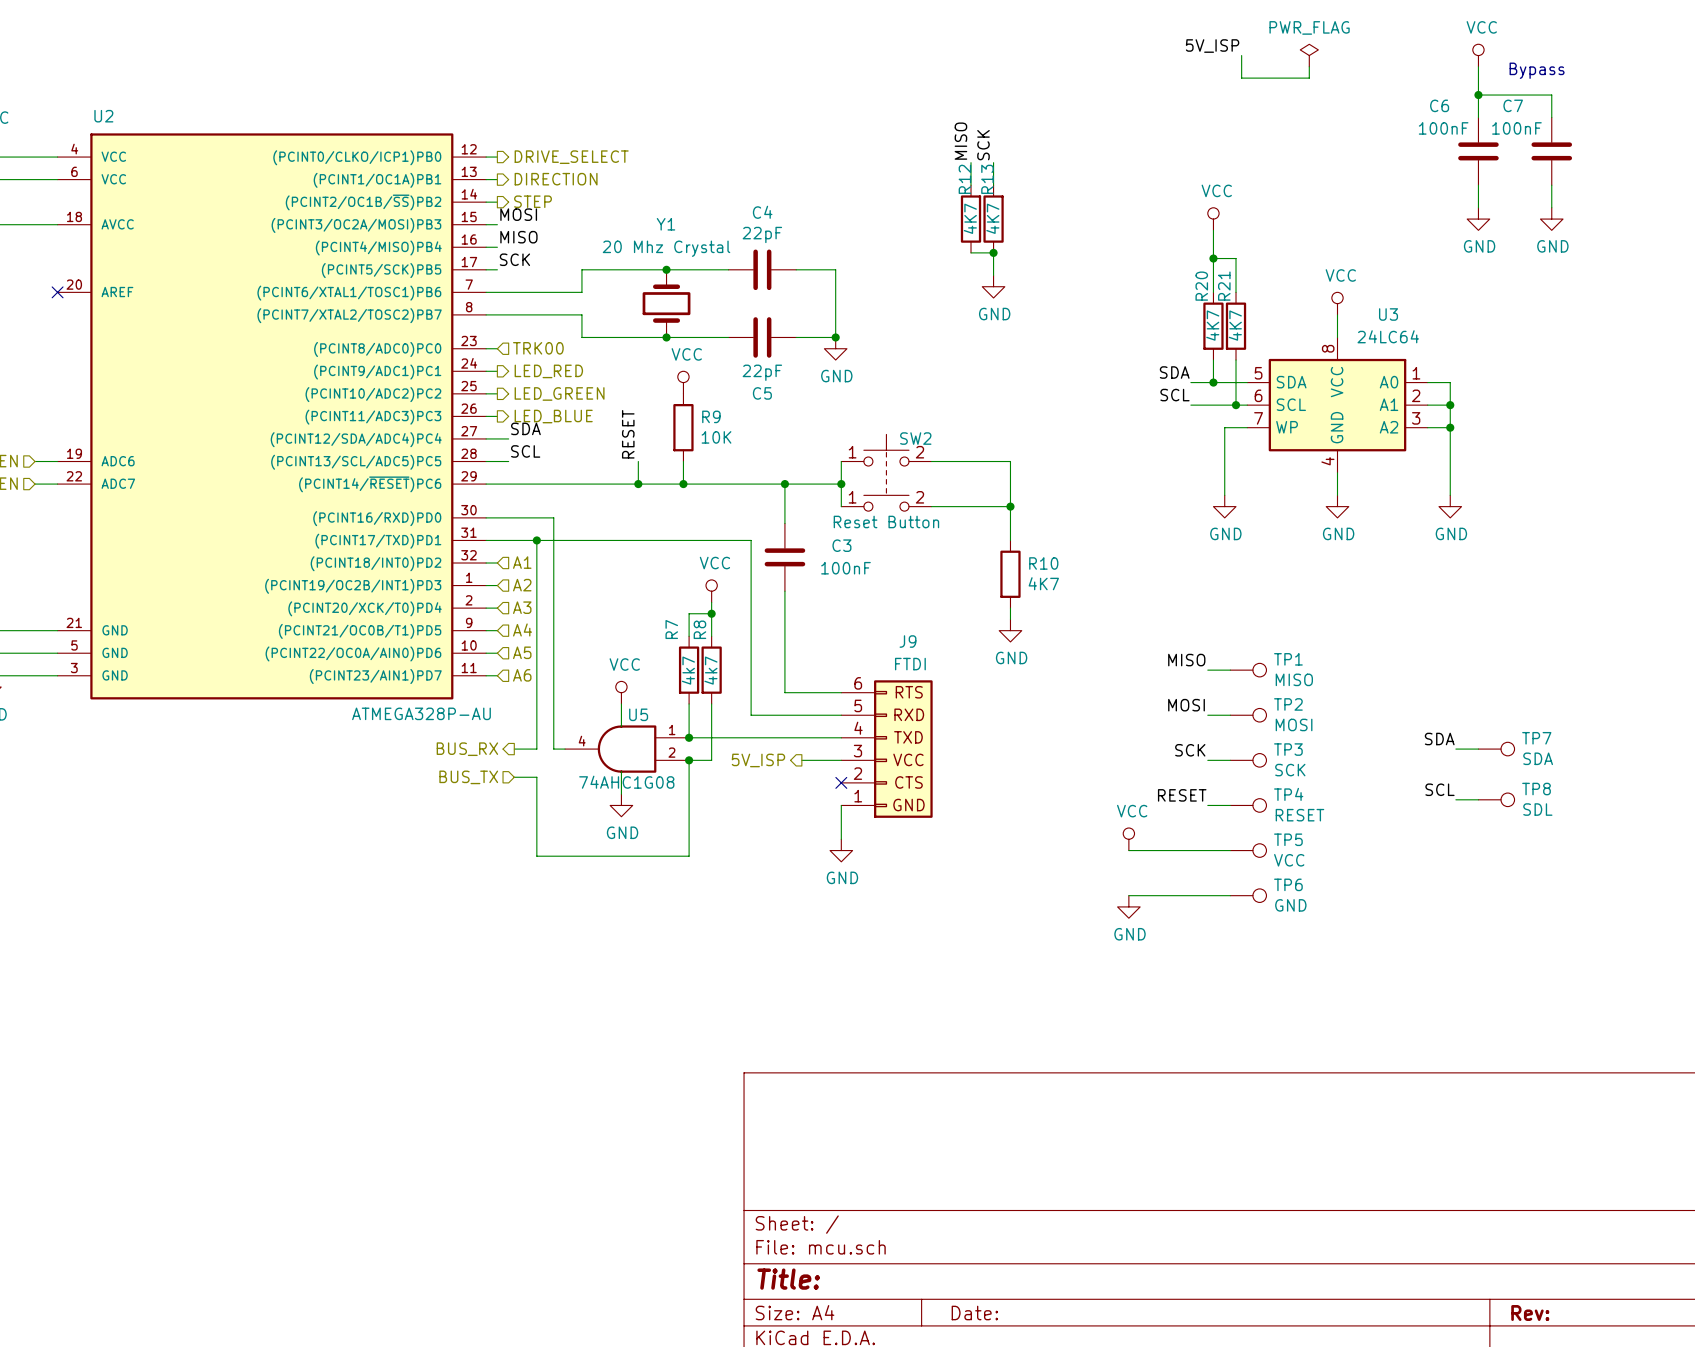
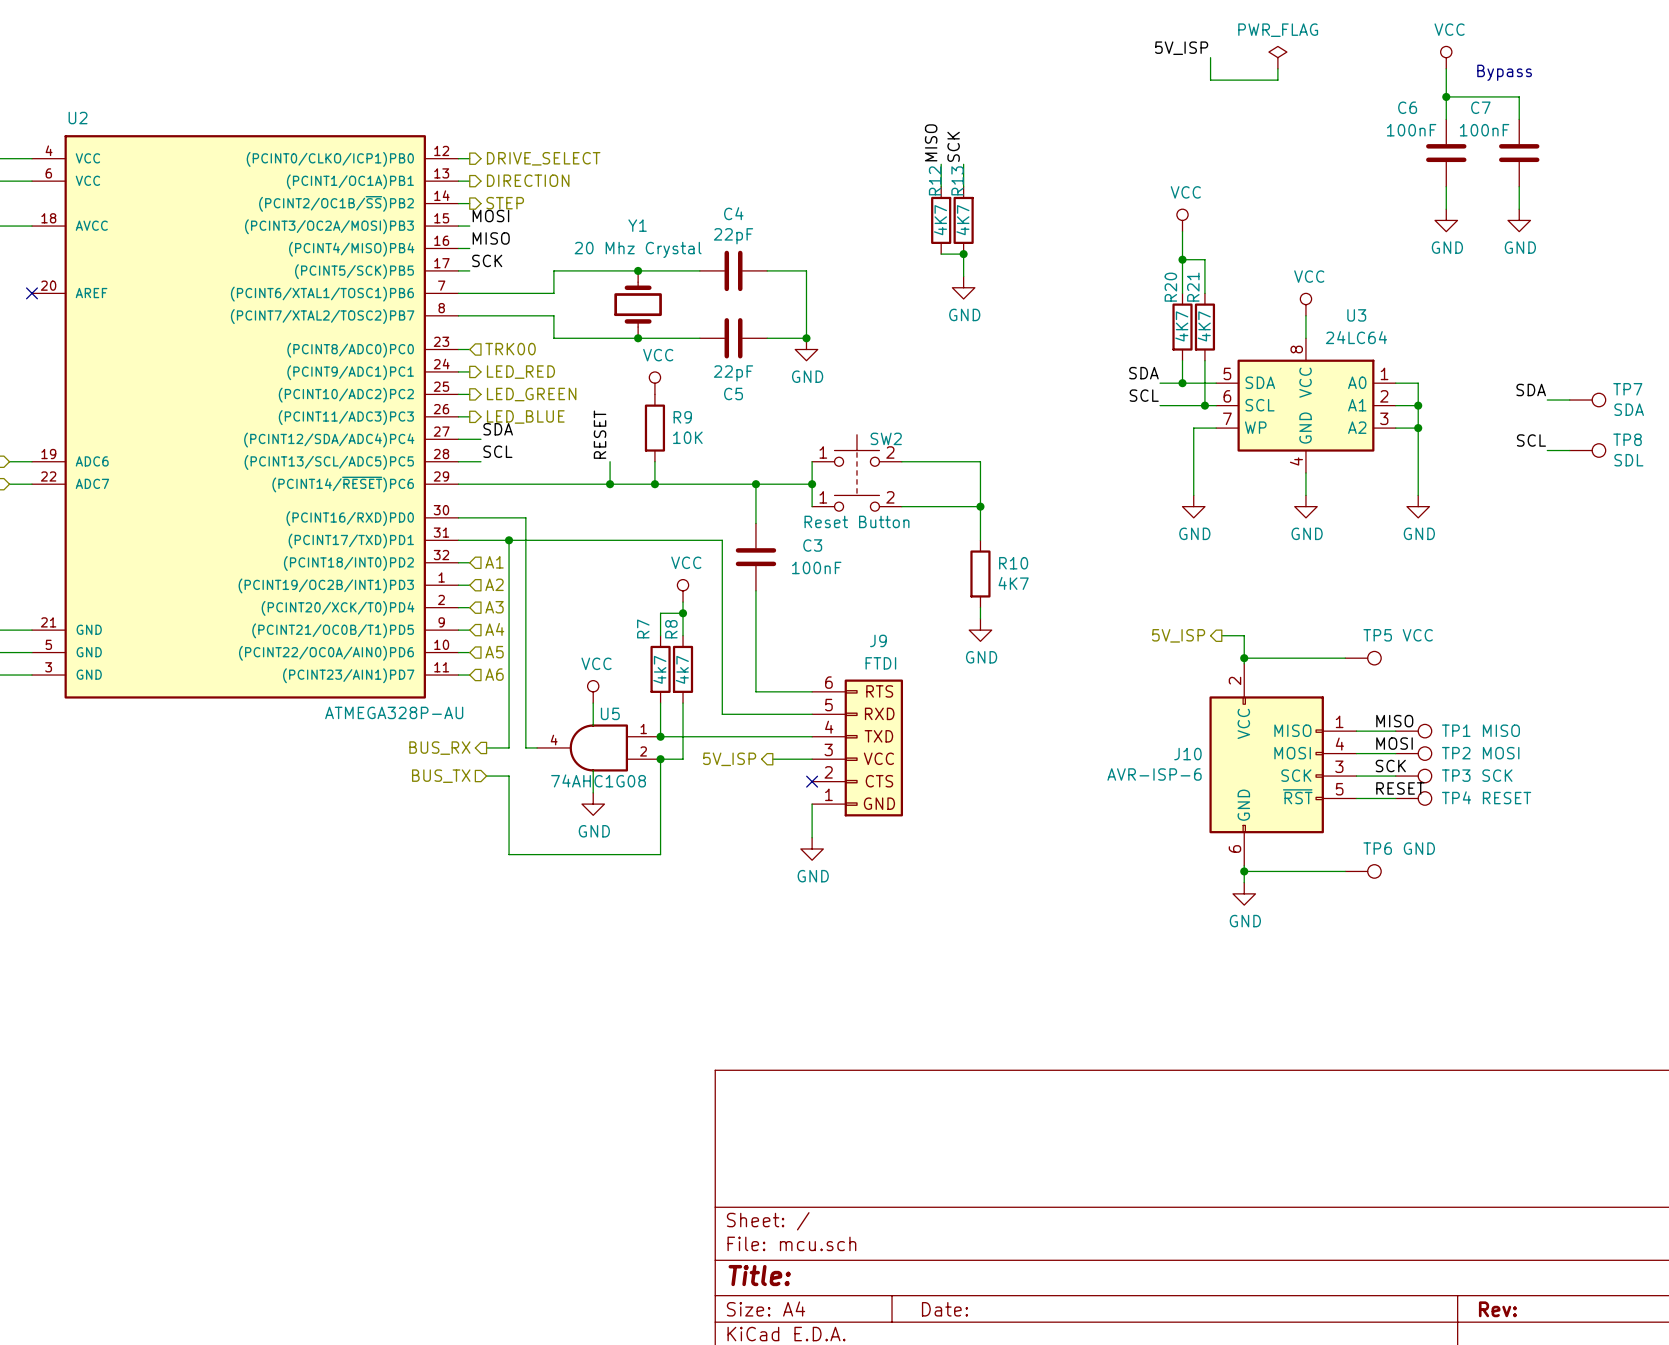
label: none -> SDA (1531, 389)
wire: none -> (1547, 400) (1569, 400)
label: none -> SCL (1531, 440)
wire: none -> (1547, 450) (1569, 450)
hierarchical label: none -> 5V_ISP (1178, 635)
wire: none -> (1221, 635) (1244, 635) (1244, 663)
wire: none -> (1244, 658) (1345, 658)
junction: none -> (1244, 658)
TP1 name position: TP1 (1288, 659) -> TP1 (1456, 730)
label position: MISO (1186, 660) -> MISO (1394, 721)
wire: (1207, 670) (1230, 670) -> none
TP1 position: (1248, 670) -> (1413, 731)
TP1 value position: MISO (1294, 679) -> MISO (1501, 730)
TP2 name position: TP2 (1288, 704) -> TP2 (1456, 753)
label position: MOSI (1186, 705) -> MOSI (1394, 743)
wire: (1207, 715) (1230, 715) -> none
TP2 position: (1248, 715) -> (1413, 753)
TP2 value position: MOSI (1294, 724) -> MOSI (1501, 753)
wire: none -> (1356, 731) (1395, 731)
label: SDA (1439, 739) -> none
TP3 name position: TP3 (1288, 749) -> TP3 (1456, 775)
wire: (1455, 749) (1478, 749) -> none
TP7 position: (1496, 749) -> (1587, 400)
label position: SCK (1190, 750) -> SCK (1390, 766)
wire: none -> (1356, 753) (1395, 753)
wire: (1207, 760) (1230, 760) -> none
TP3 position: (1248, 760) -> (1413, 776)
J10: none -> AVR-ISP-6 (1282, 764)
TP3 value position: SCK (1290, 770) -> SCK (1497, 775)
wire: none -> (1356, 776) (1395, 776)
label: SCL (1439, 789) -> none
TP4 name position: TP4 (1288, 794) -> TP4 (1456, 797)
label position: RESET (1182, 795) -> RESET (1400, 788)
wire: none -> (1356, 798) (1395, 798)
wire: (1455, 799) (1478, 799) -> none
TP8 position: (1496, 799) -> (1587, 450)
wire: (1207, 805) (1230, 805) -> none
TP4 position: (1248, 805) -> (1413, 798)
TP4 value position: RESET (1299, 815) -> RESET (1507, 798)
power symbol: VCC (1128, 839) -> none
TP5 name position: TP5 (1288, 839) -> TP5 (1377, 635)
wire: (1128, 850) (1230, 850) -> (1244, 871) (1345, 871)
TP5 position: (1248, 850) -> (1363, 658)
TP5 value position: VCC (1289, 860) -> VCC (1417, 635)
wire: none -> (1244, 865) (1244, 882)
junction: none -> (1244, 871)
TP6 name position: TP6 (1288, 884) -> TP6 (1377, 848)
wire: (1128, 895) (1230, 895) -> none
TP6 position: (1248, 895) -> (1363, 871)
TP6 value position: GND (1290, 905) -> GND (1419, 848)
power symbol position: GND (1128, 906) -> GND (1244, 893)

